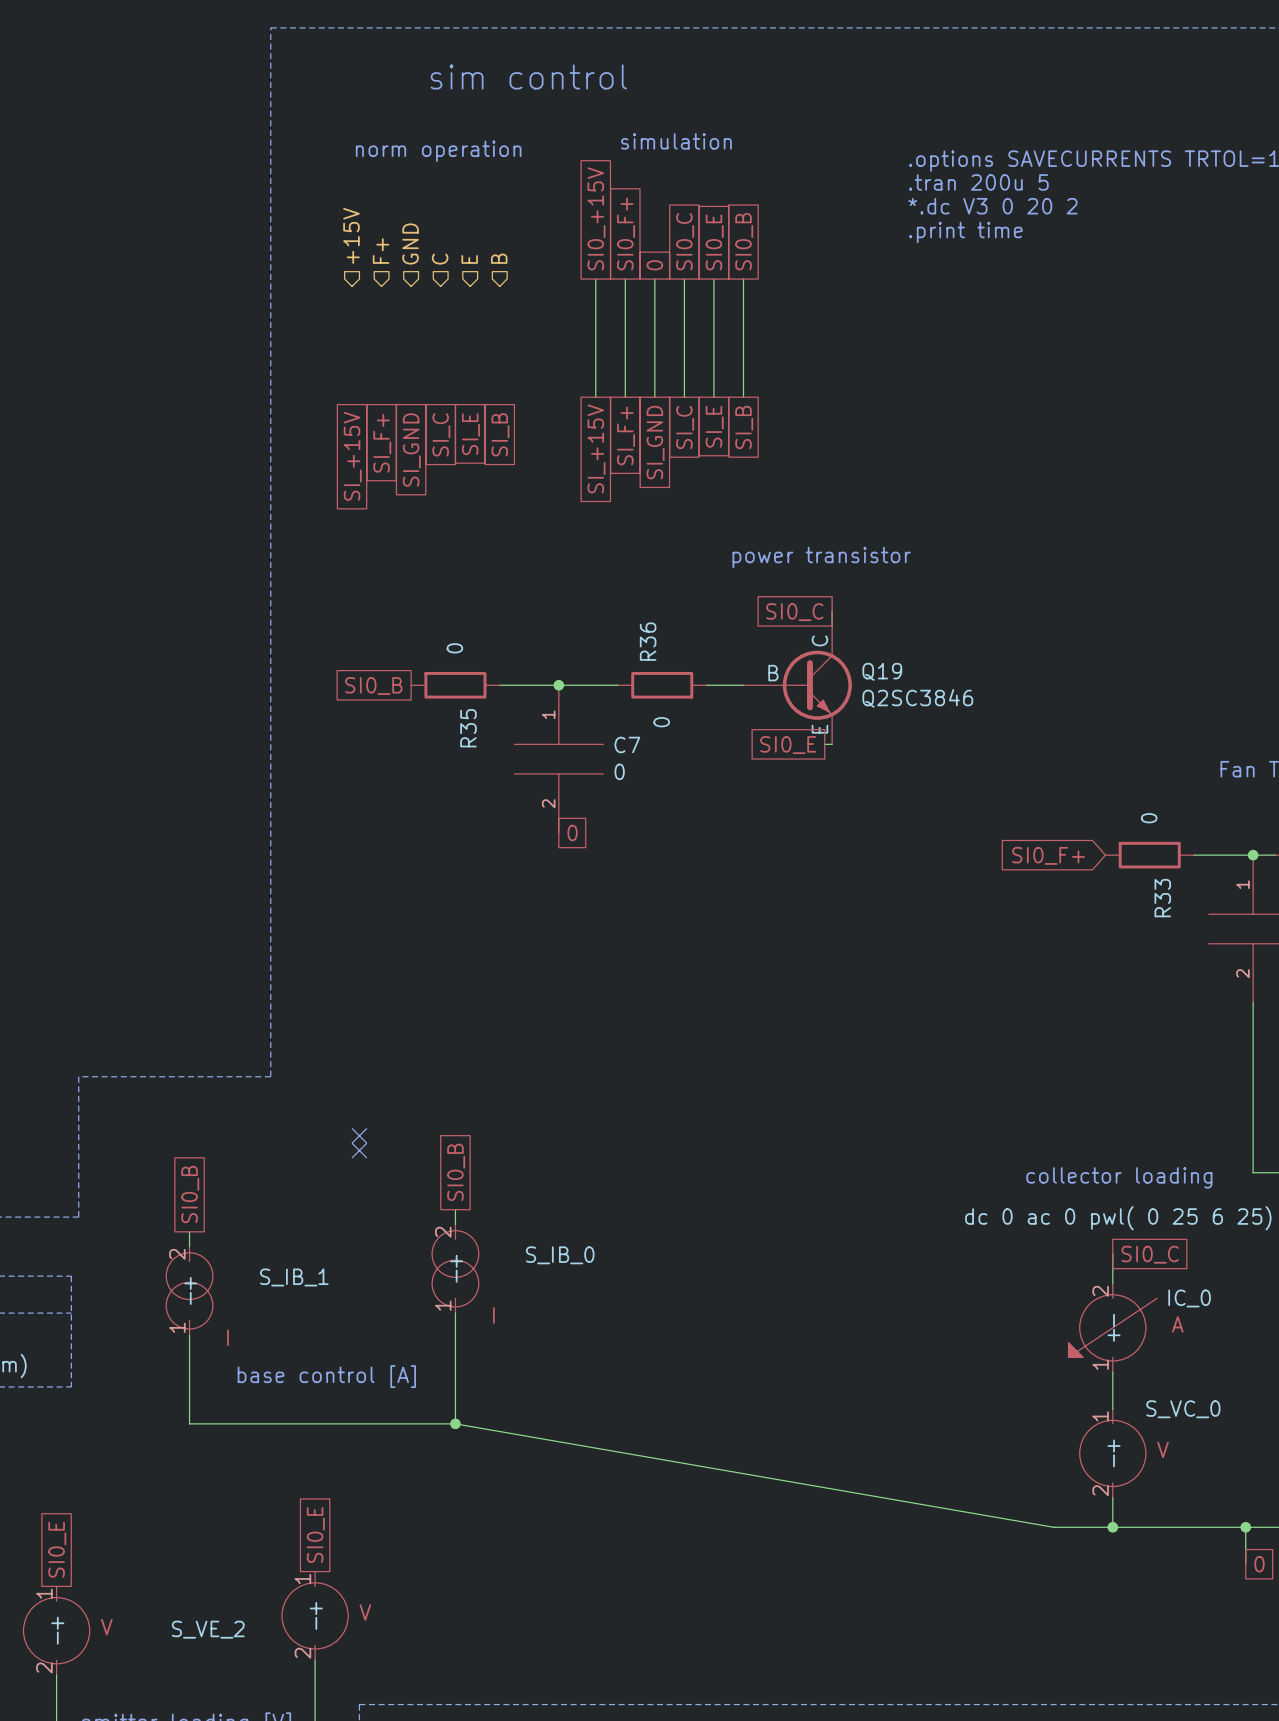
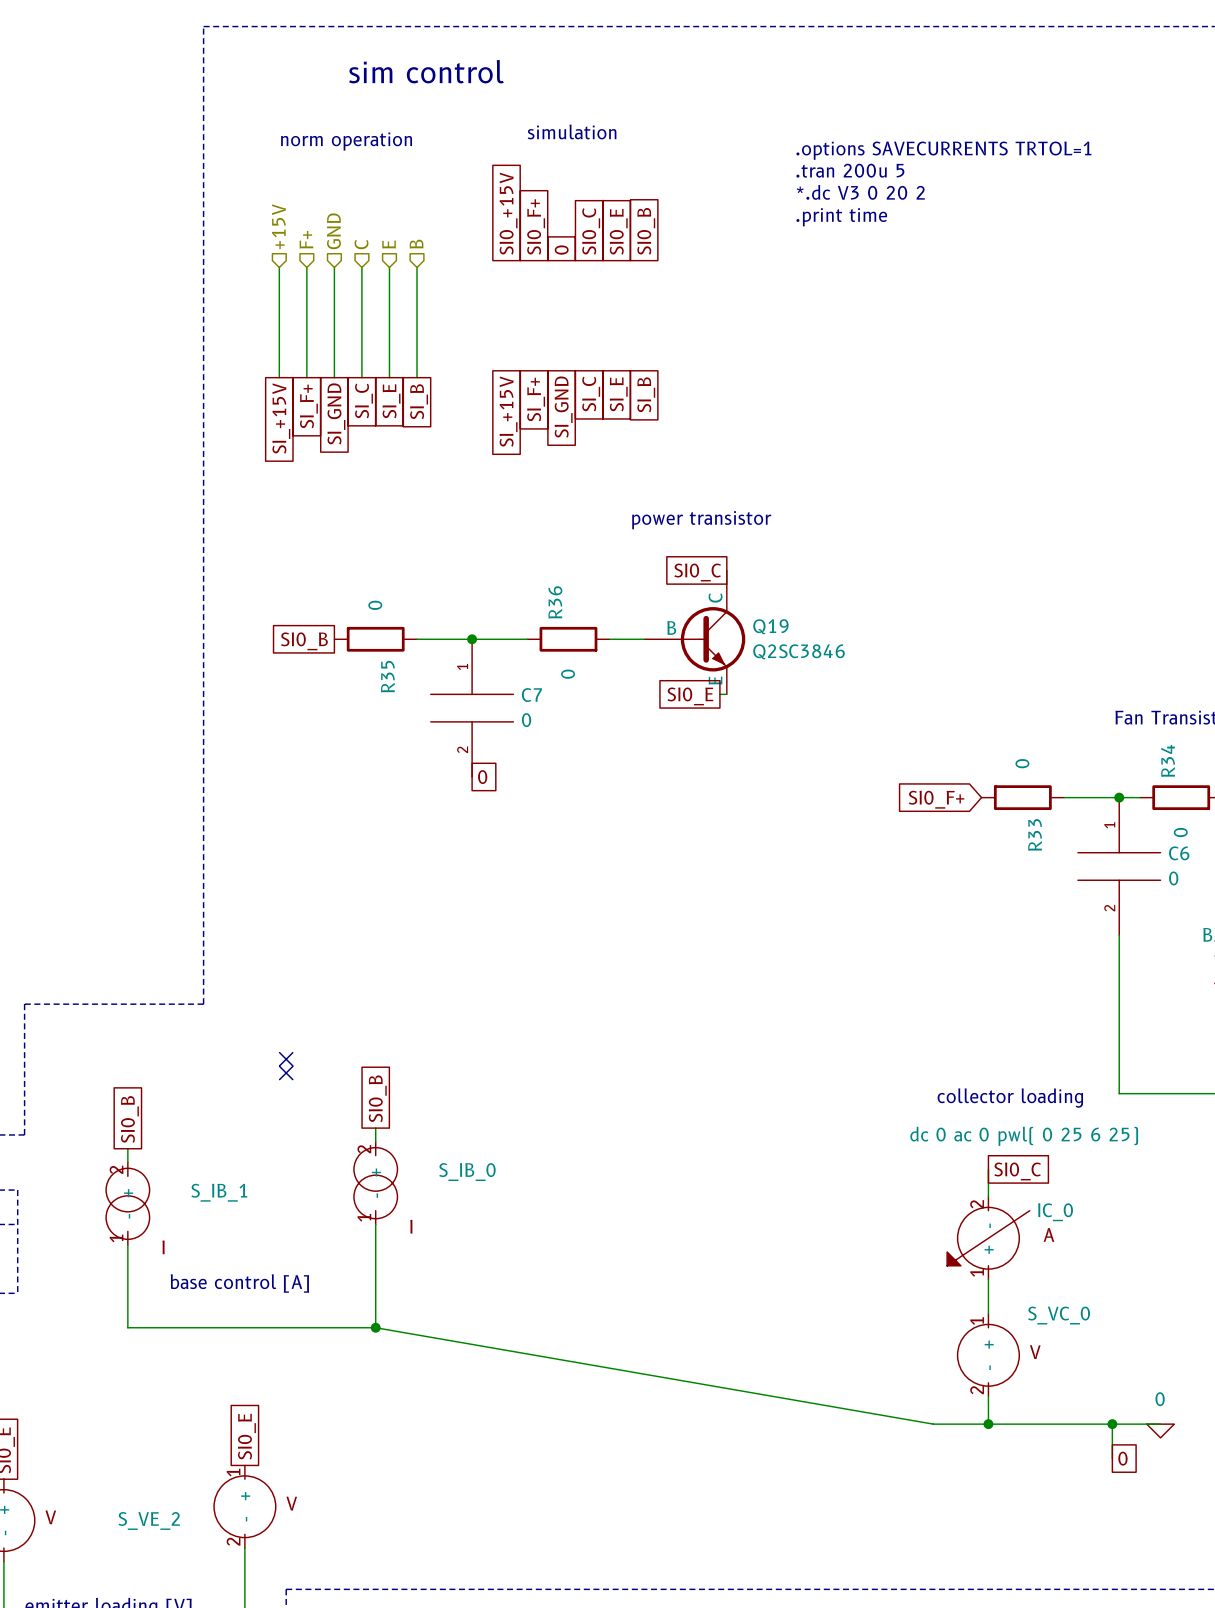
wire: (595, 279) (595, 397) -> (417, 267) (417, 377)
wire: (625, 279) (625, 397) -> (389, 267) (389, 377)
wire: (654, 279) (654, 397) -> (361, 267) (361, 377)
wire: (684, 279) (684, 397) -> (334, 267) (334, 377)
wire: (713, 279) (713, 397) -> none
wire: (743, 279) (743, 397) -> none
wire: none -> (279, 267) (279, 377)
wire: none -> (306, 267) (306, 377)

